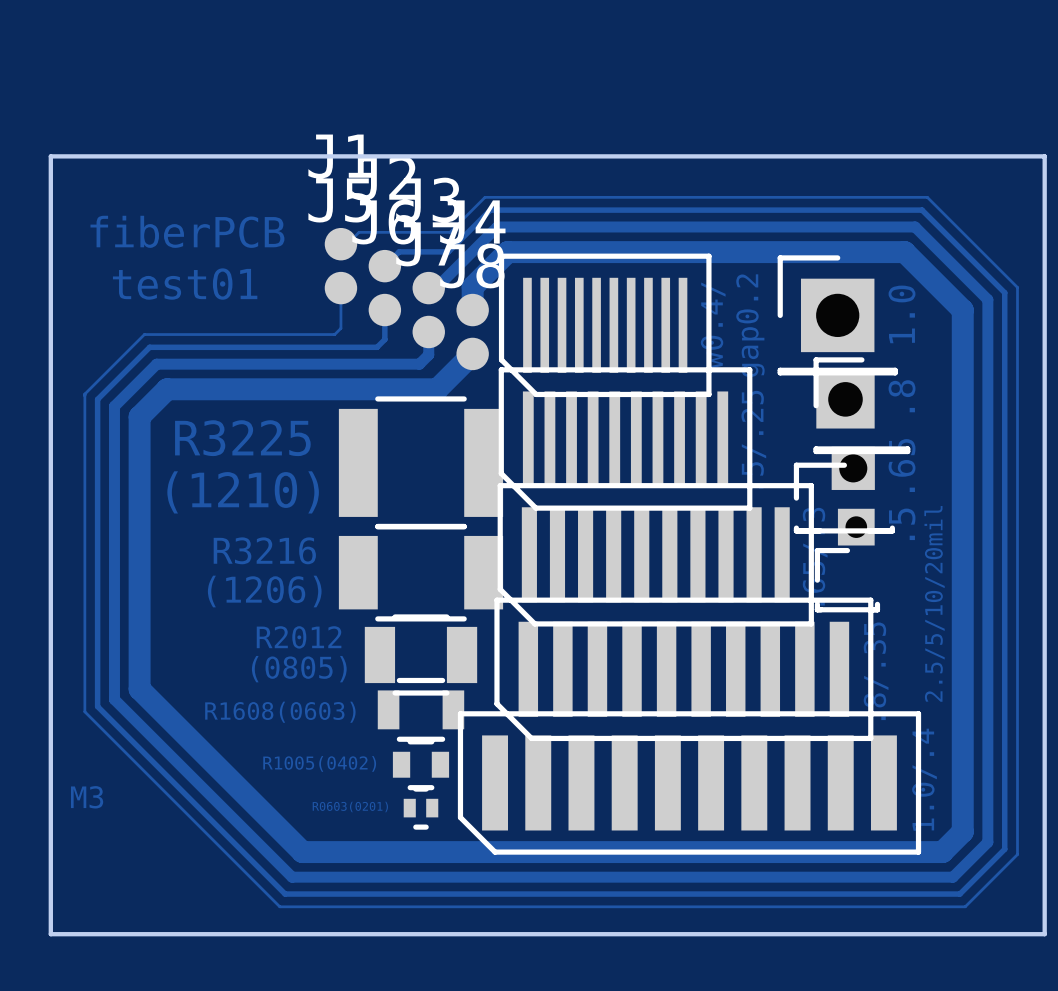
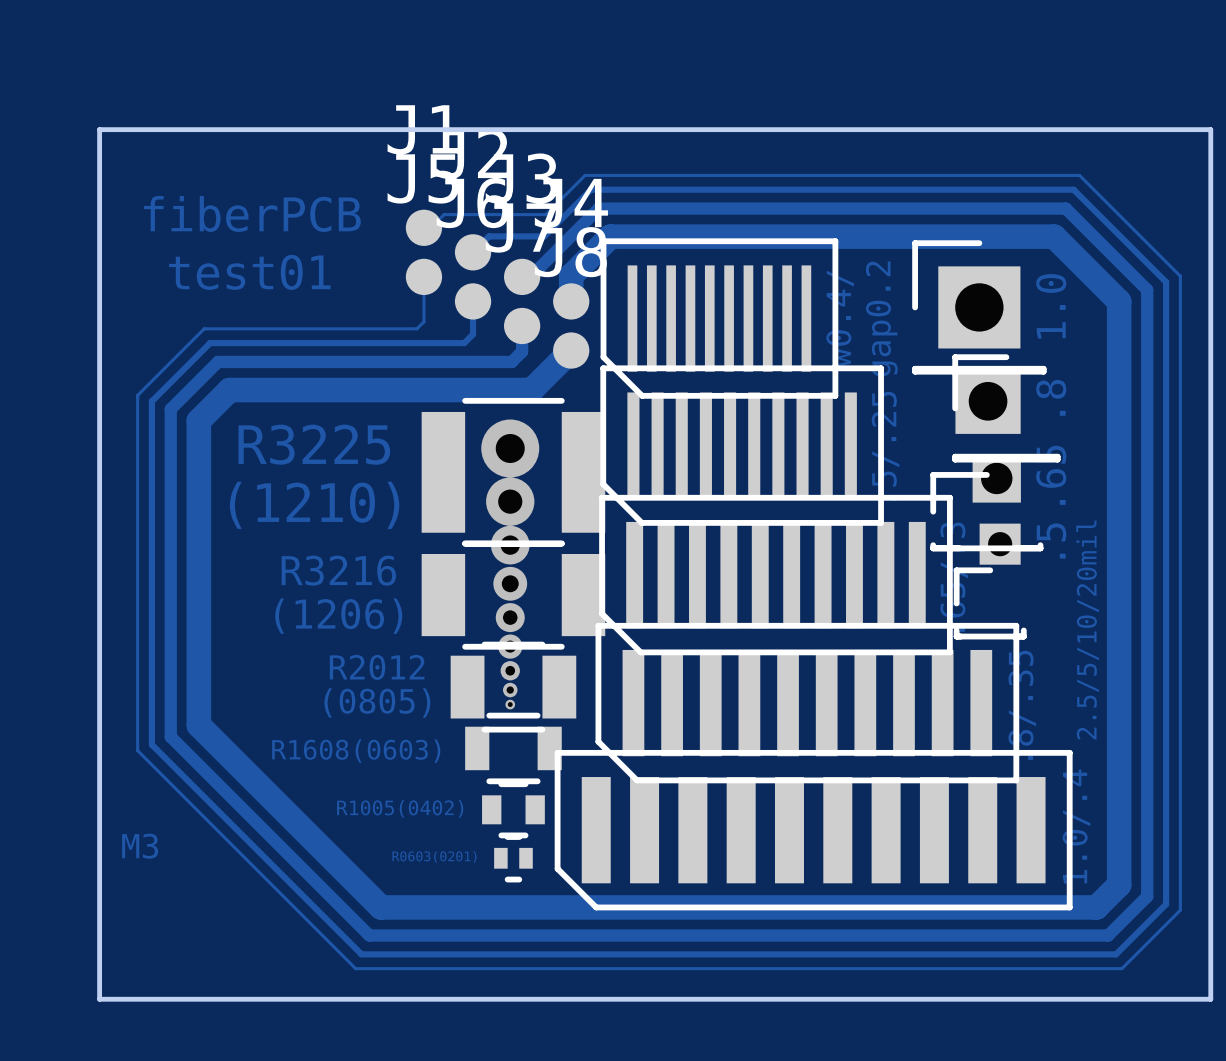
via: none -> (510, 448)
via: none -> (510, 501)
via: none -> (510, 545)
via: none -> (510, 583)
via: none -> (510, 617)
via: none -> (510, 646)
via: none -> (510, 670)
via: none -> (510, 690)
via: none -> (510, 704)

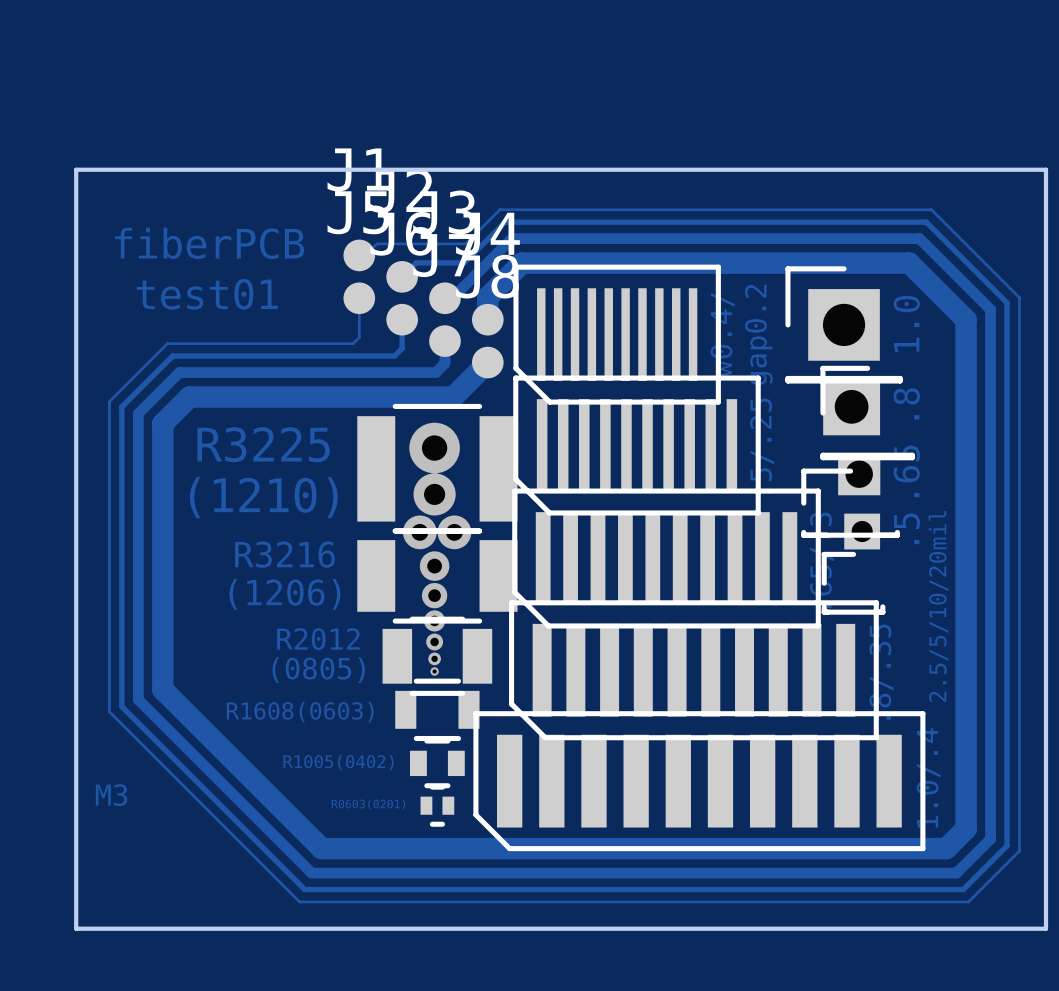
via: none -> (419, 532)
via: (510, 545) -> none
via: none -> (454, 532)

